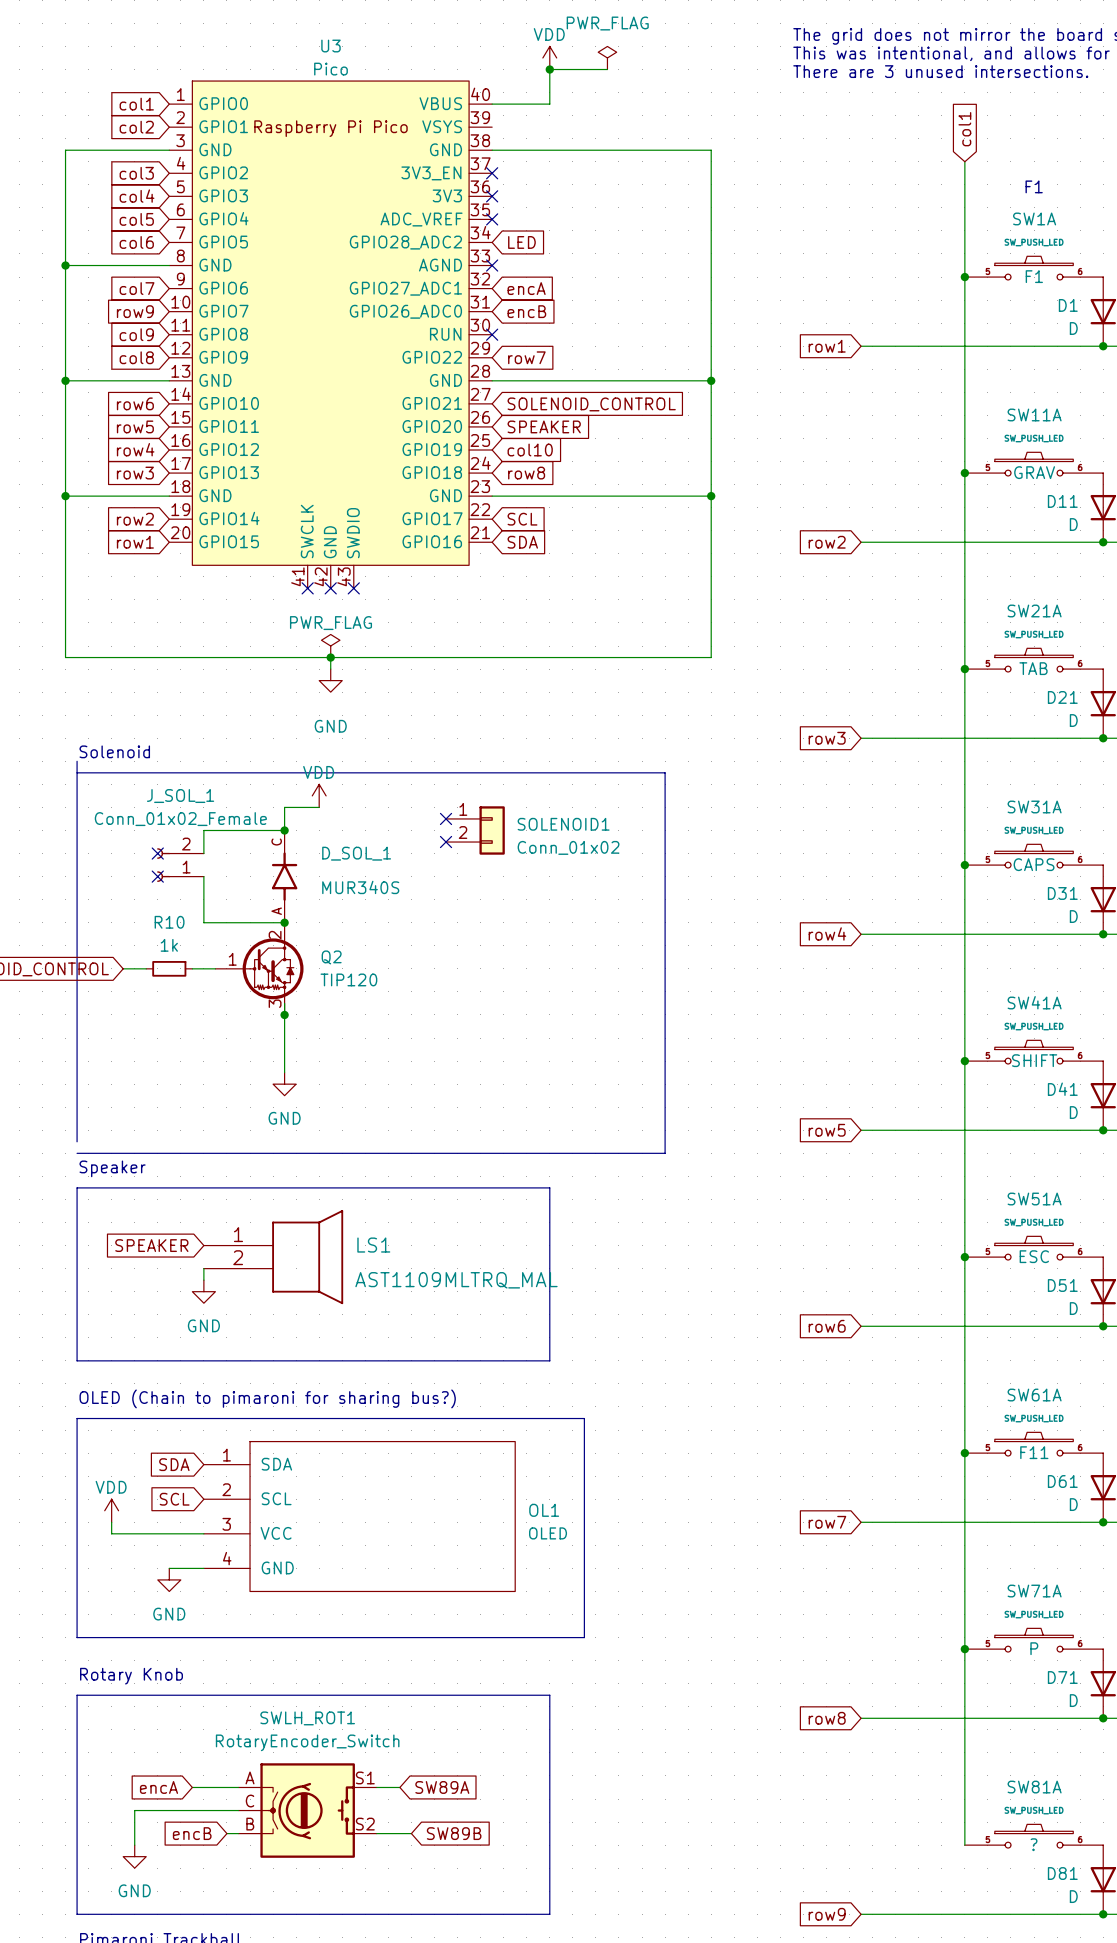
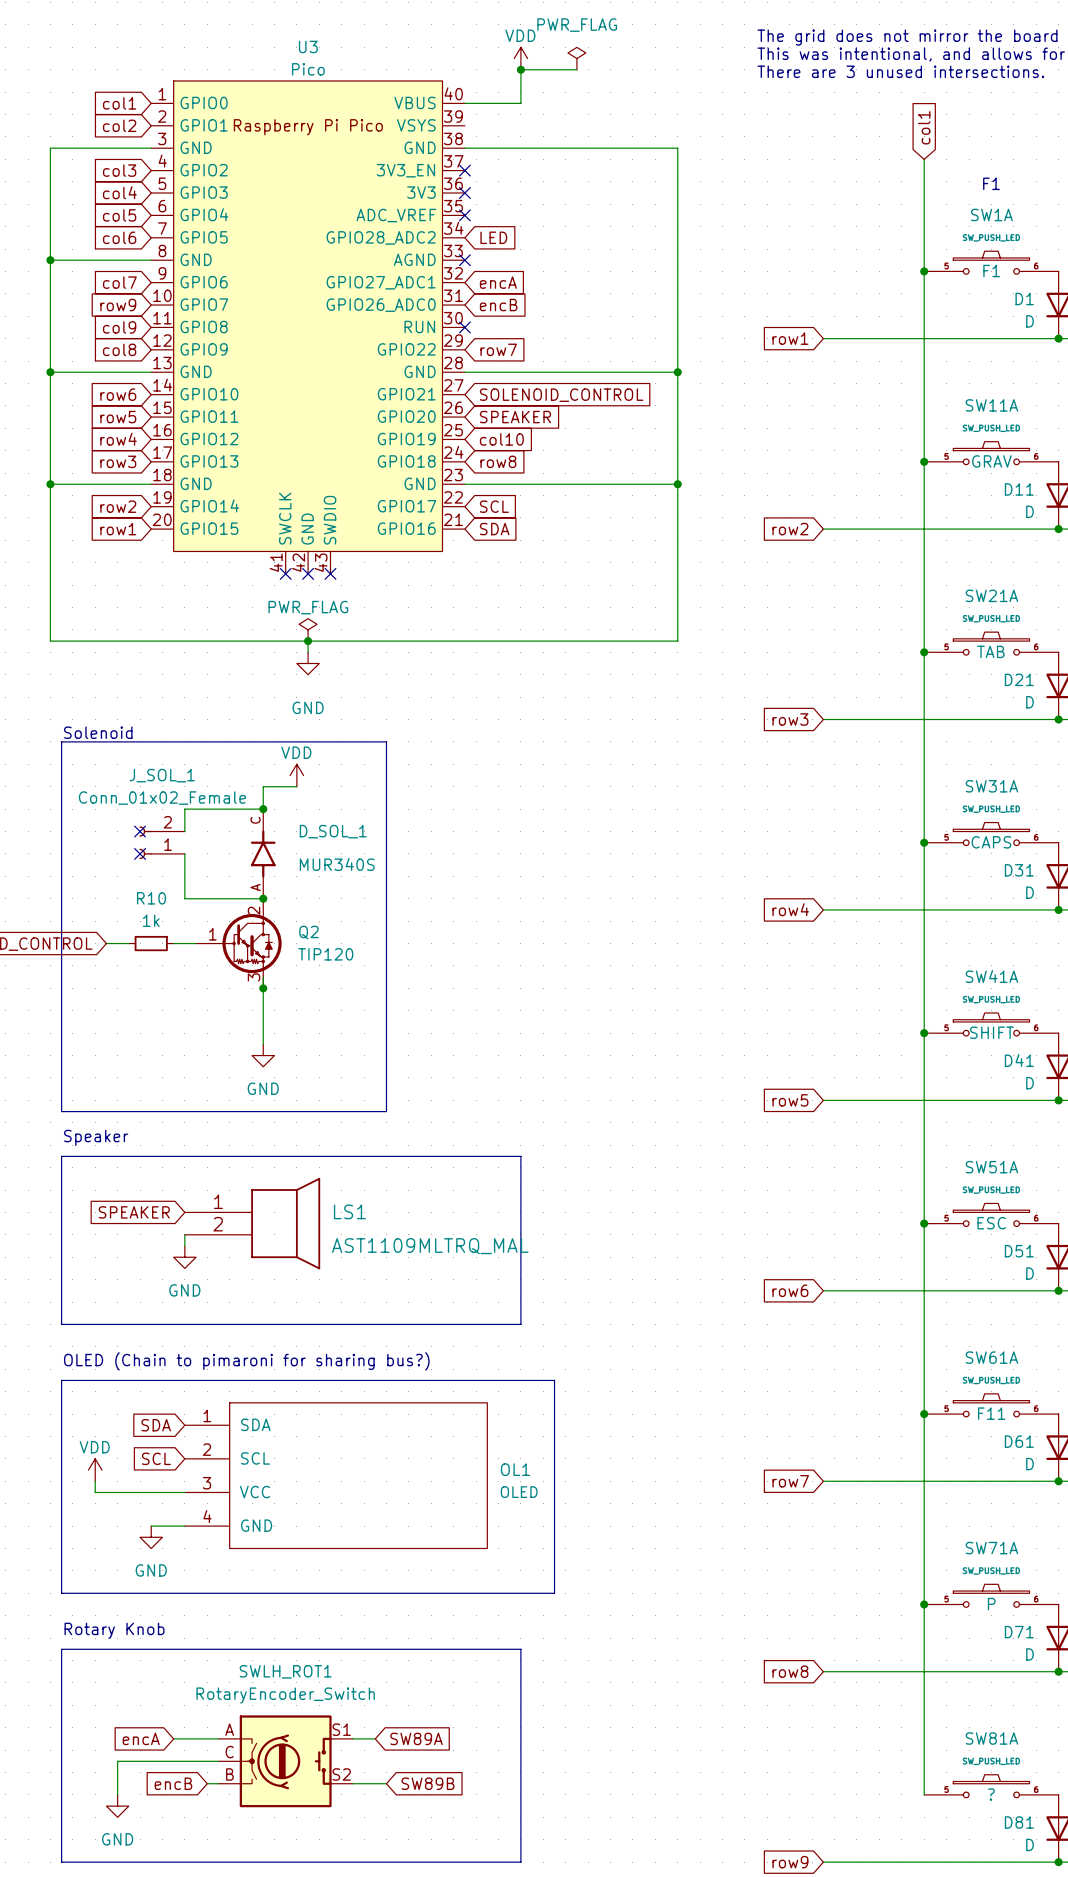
line: none -> (61, 741) (386, 741) (386, 1111) (61, 1111)
line: (77, 772) (665, 772) (665, 1153) (77, 1153) -> none
no-connect mark: (446, 818) -> none
SOLENOID1: Conn_01x02 (475, 830) -> none
no-connect mark: (446, 842) -> none

